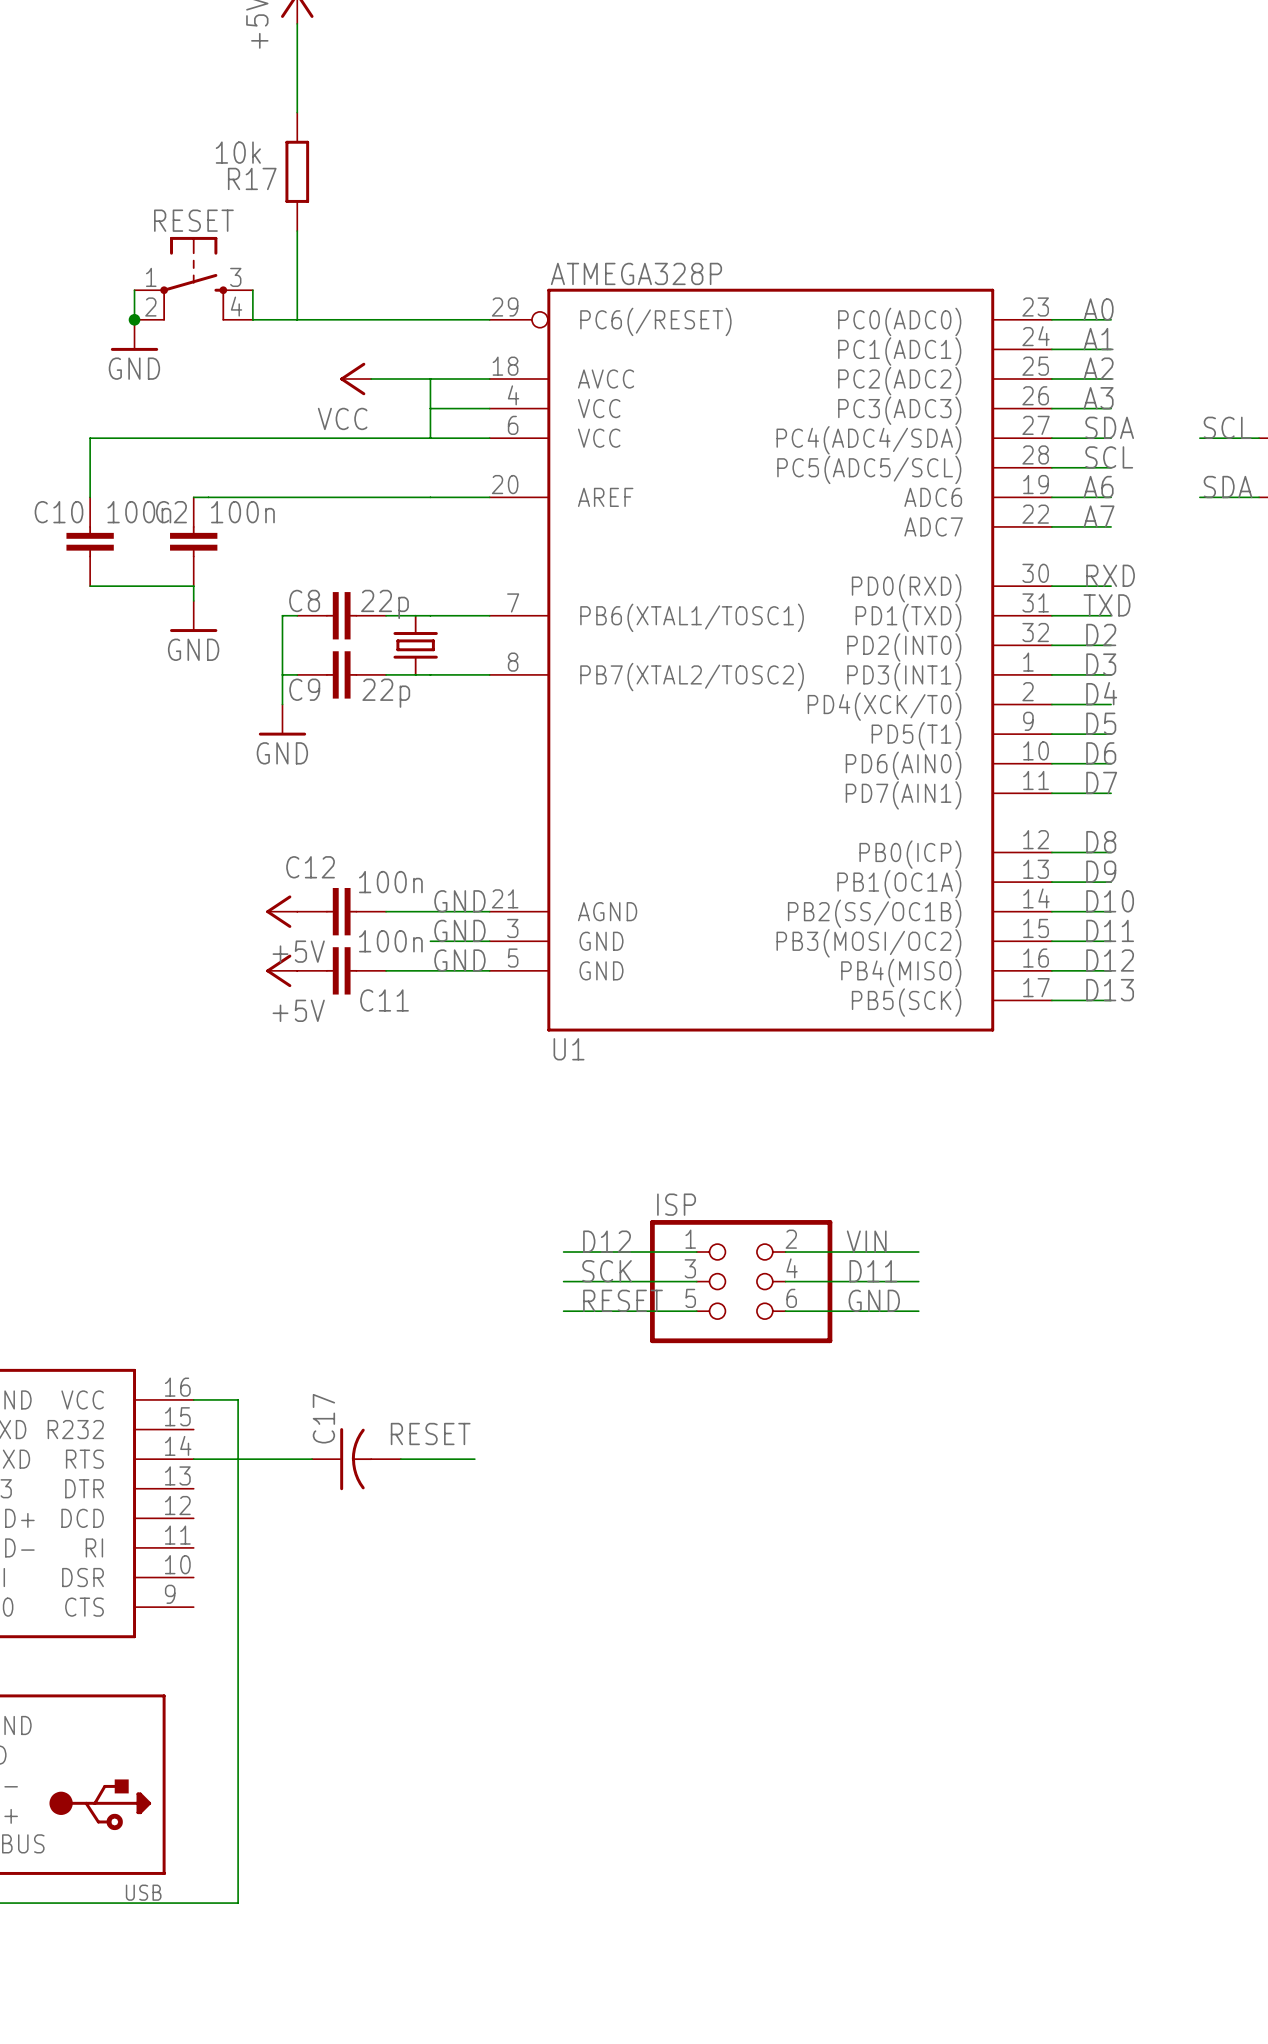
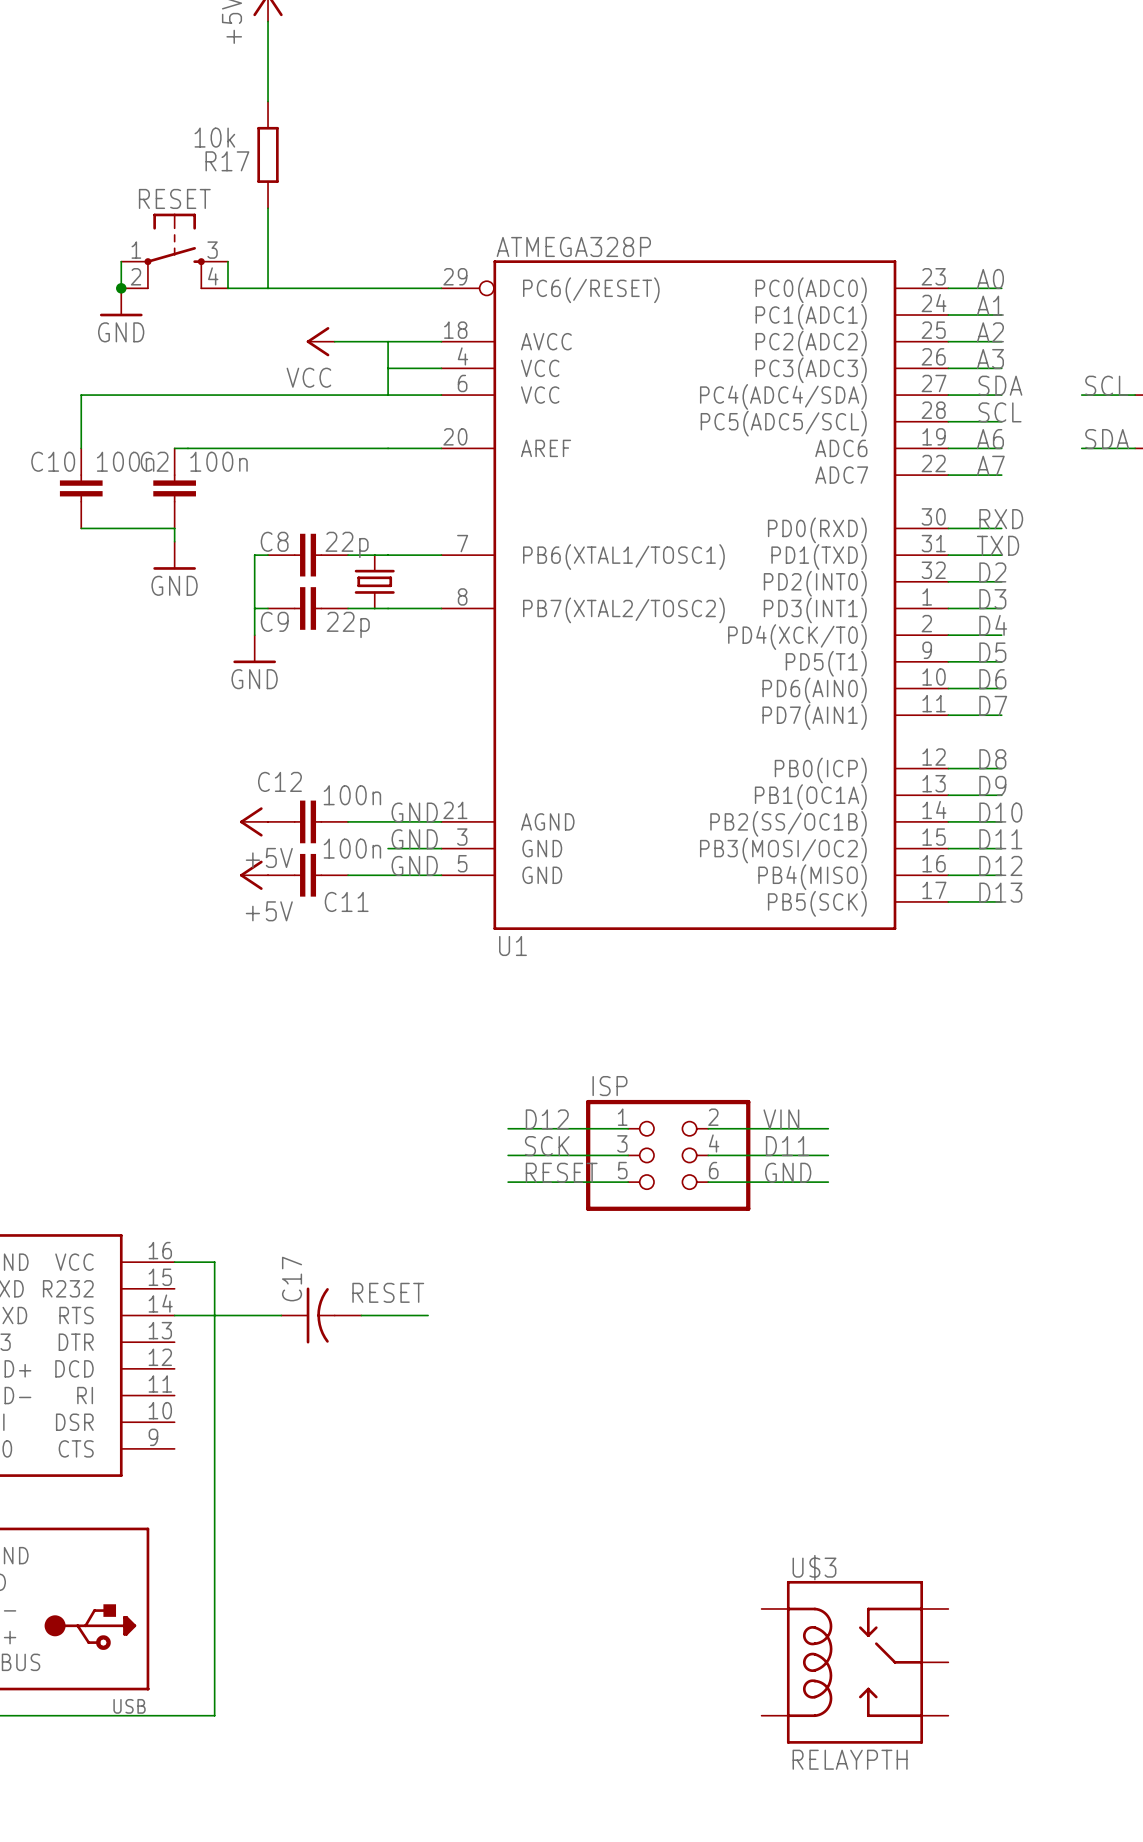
U$3: none -> RELAYPTH (854, 1662)

